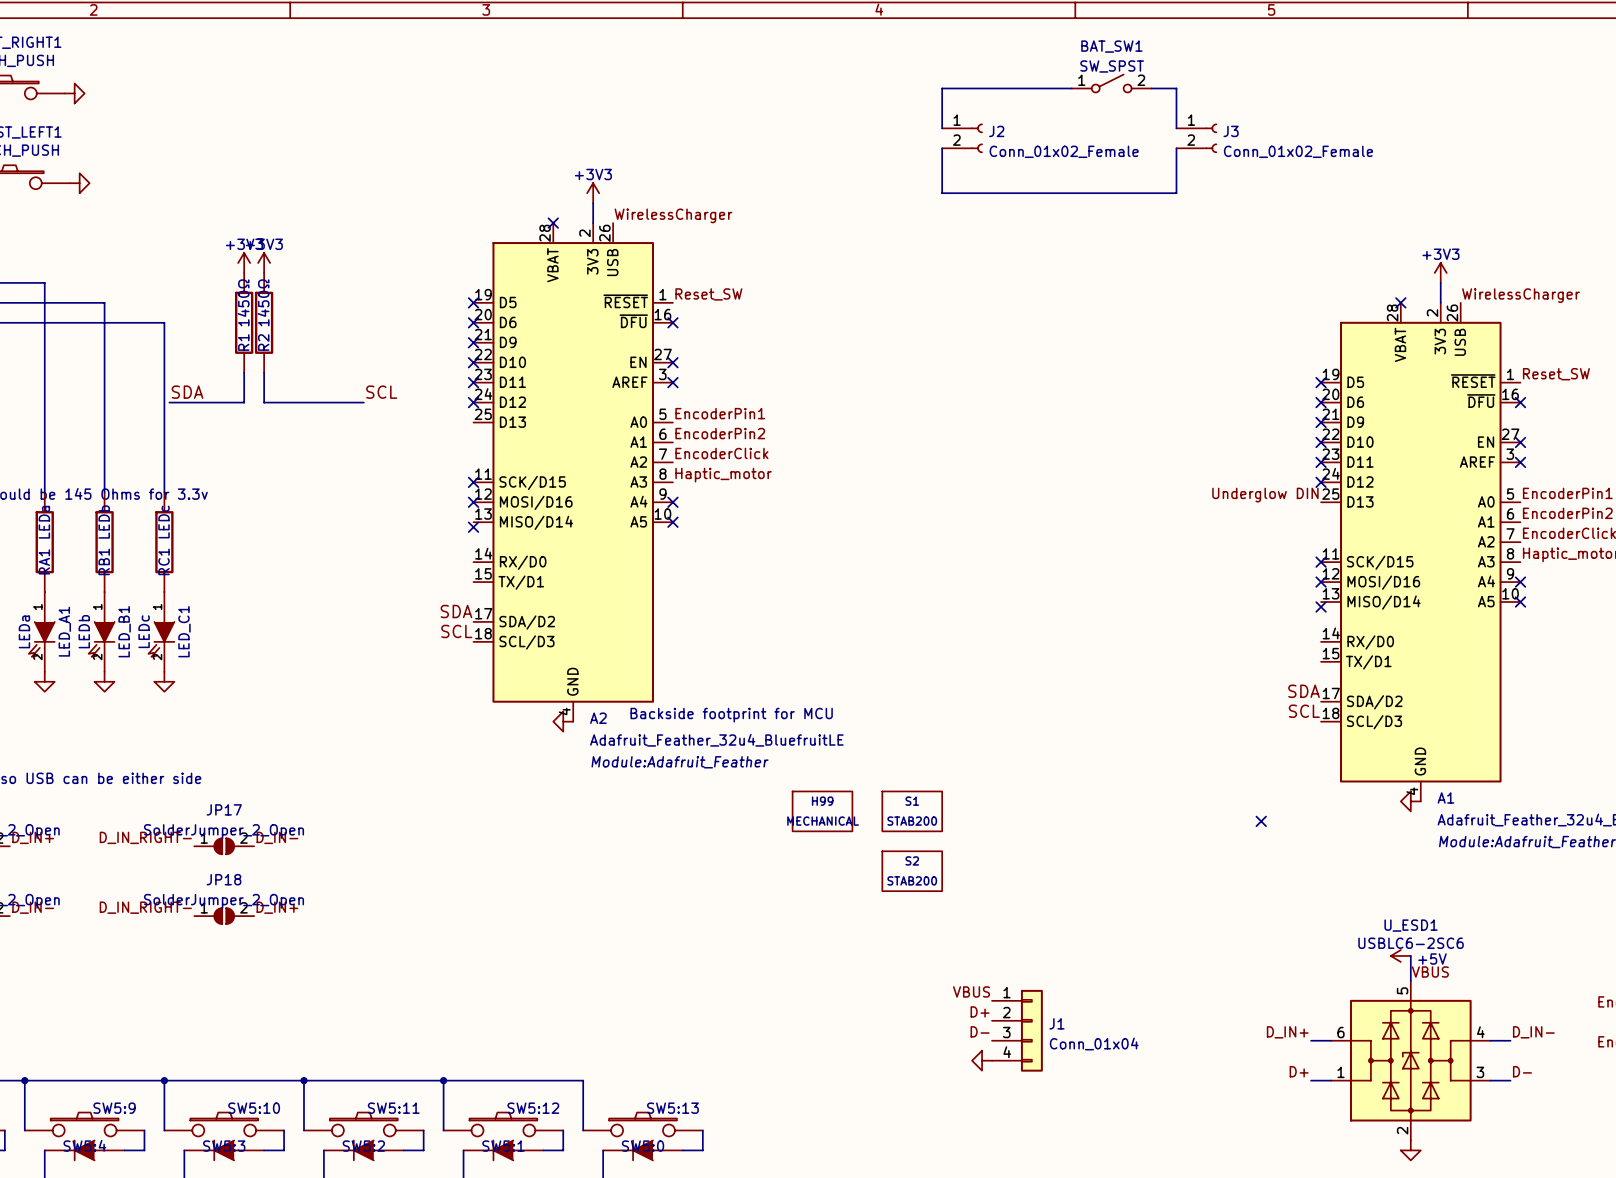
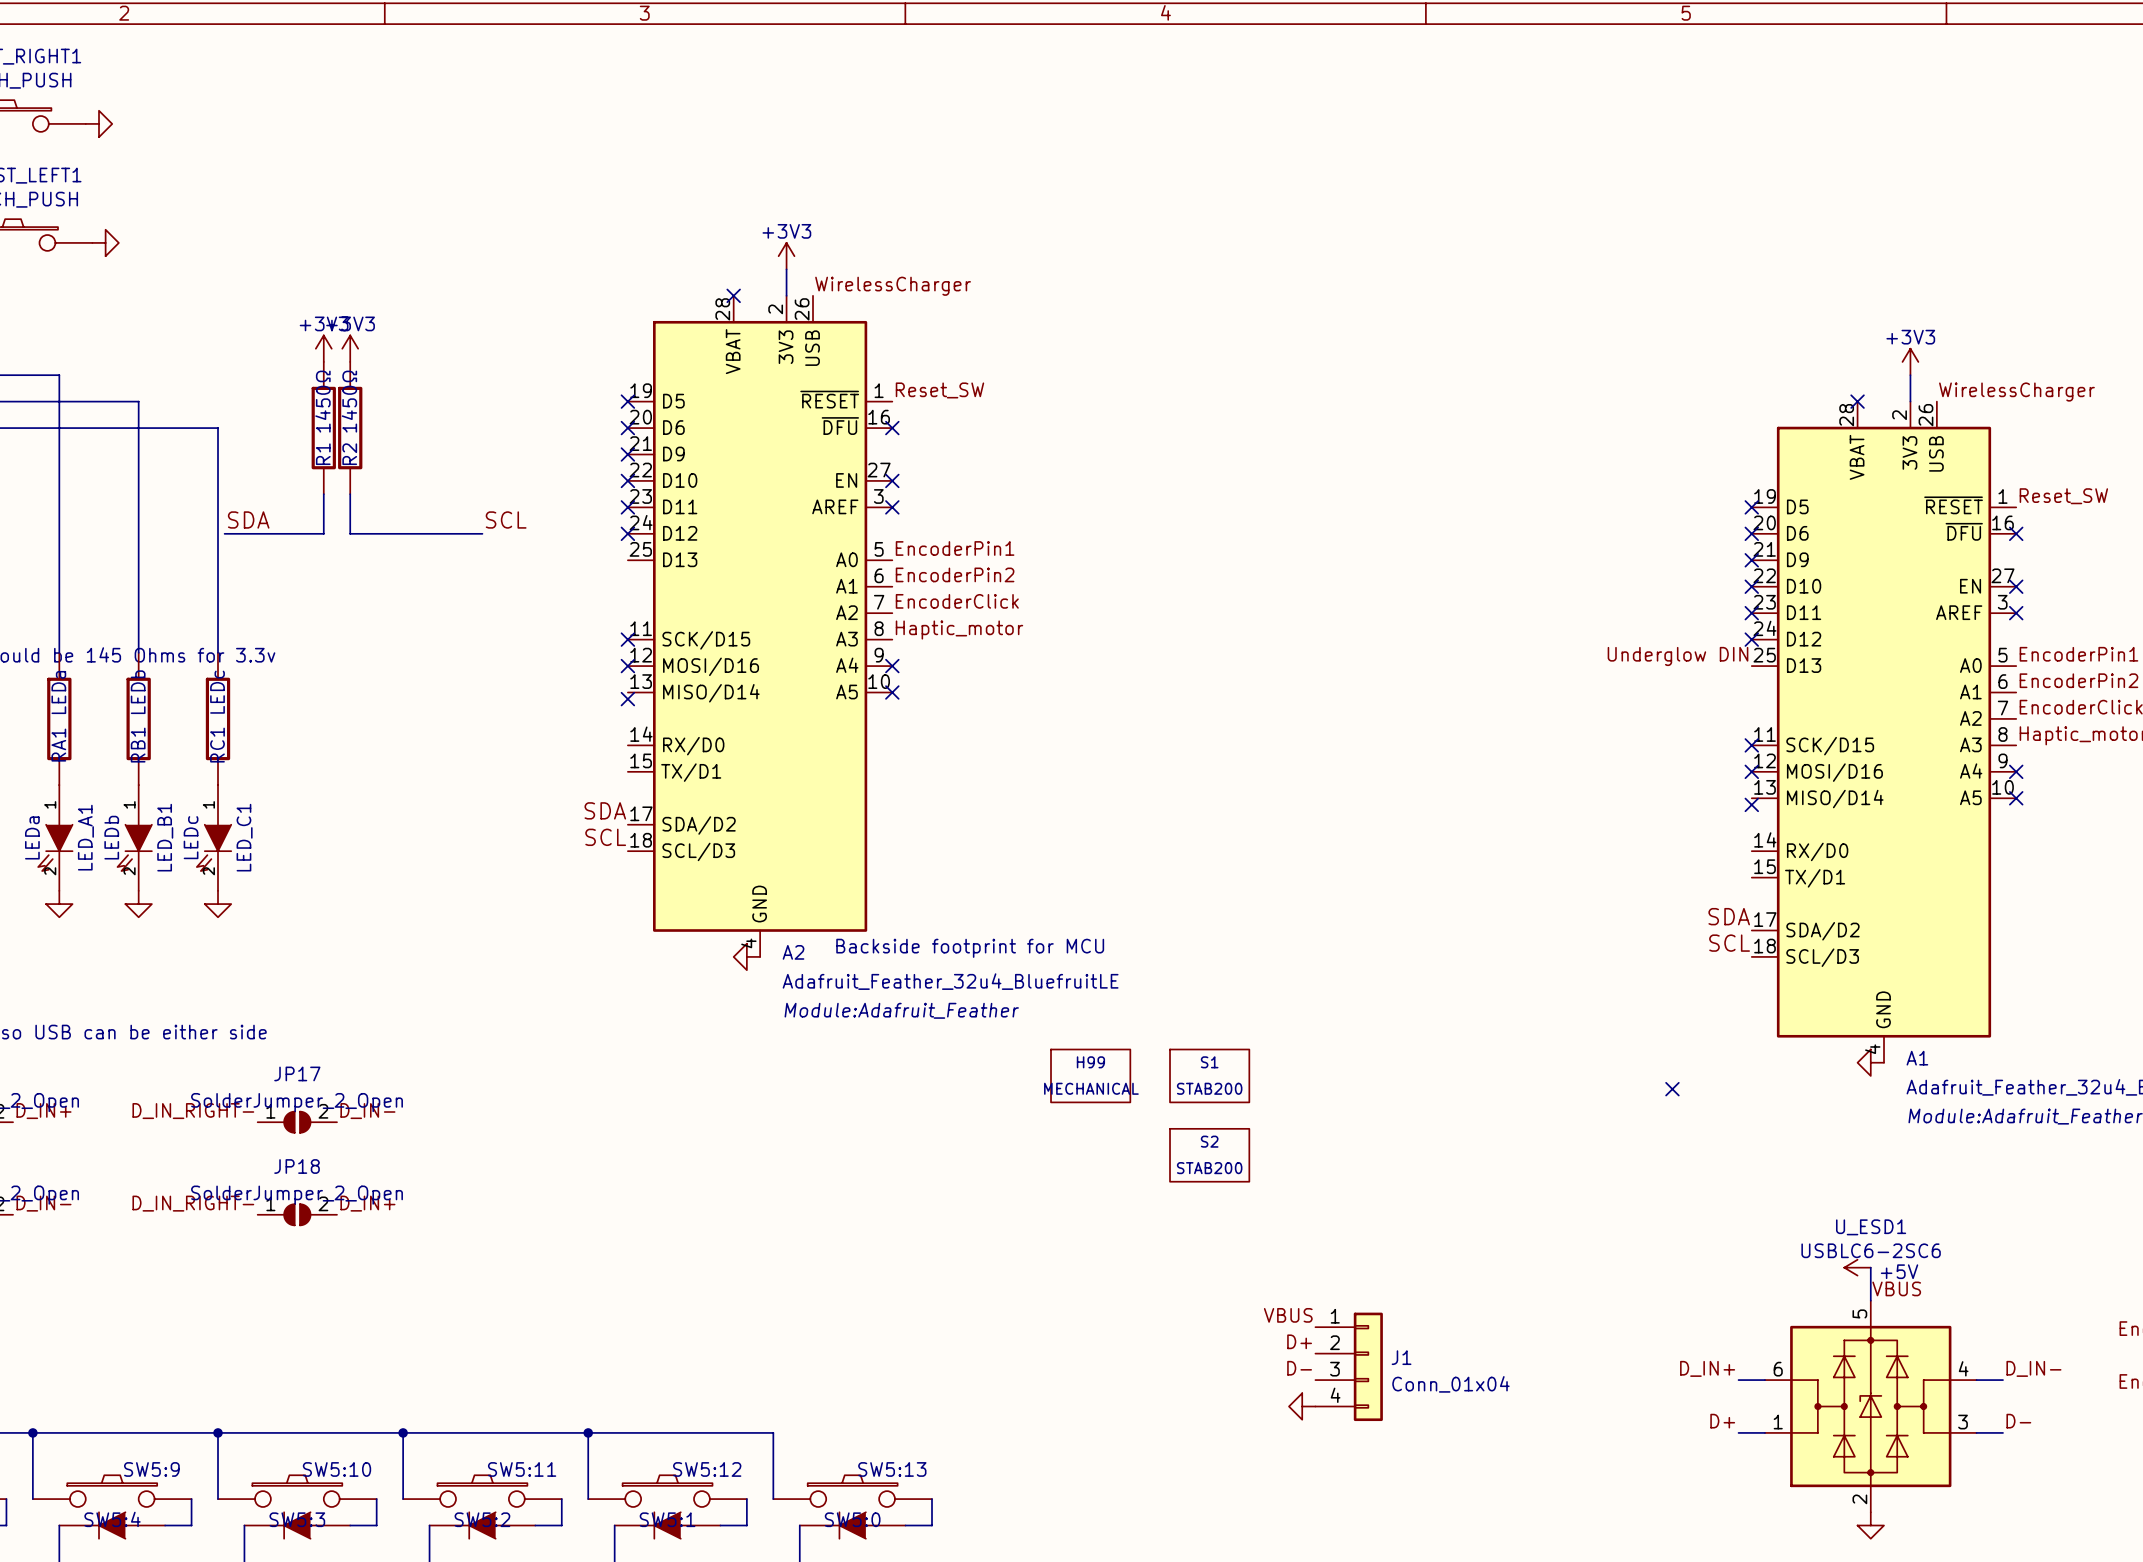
BAT_SW1: SW_SPST (1111, 83) -> none
wire: (1071, 88) (942, 88) (942, 128) -> none
wire: (1151, 88) (1176, 88) (1176, 128) -> none
J2: Conn_01x02_Female (962, 138) -> none
J3: Conn_01x02_Female (1196, 138) -> none
wire: (942, 148) (942, 193) (1176, 193) (1176, 148) -> none

